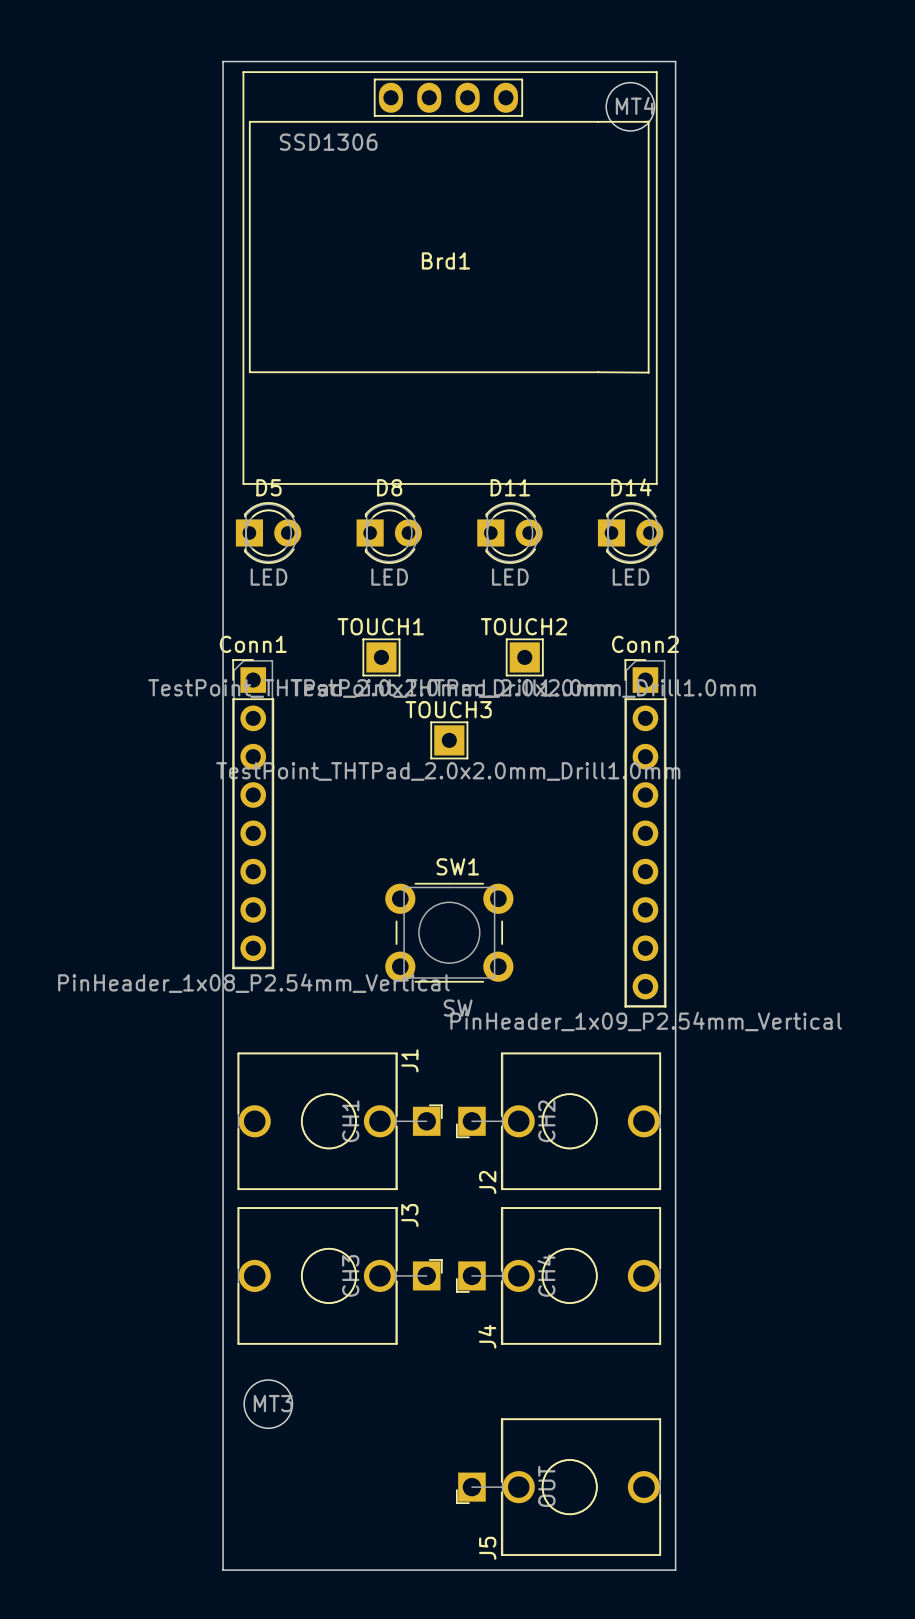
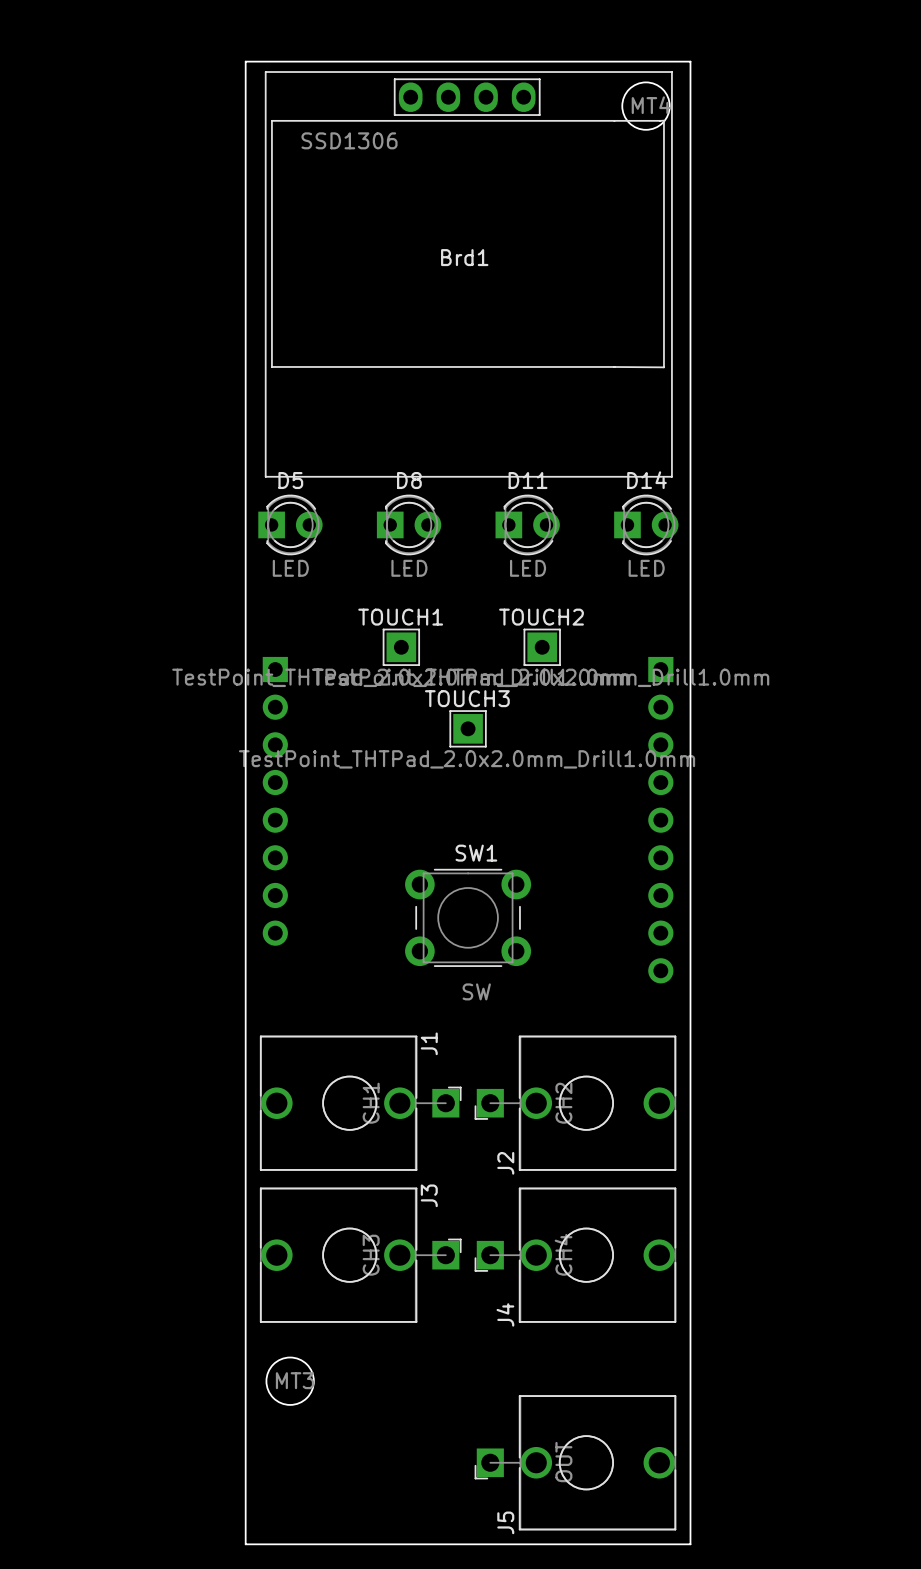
Conn1 side: top (253, 814) -> bottom (275, 801)
Conn2 side: top (645, 833) -> bottom (660, 820)

